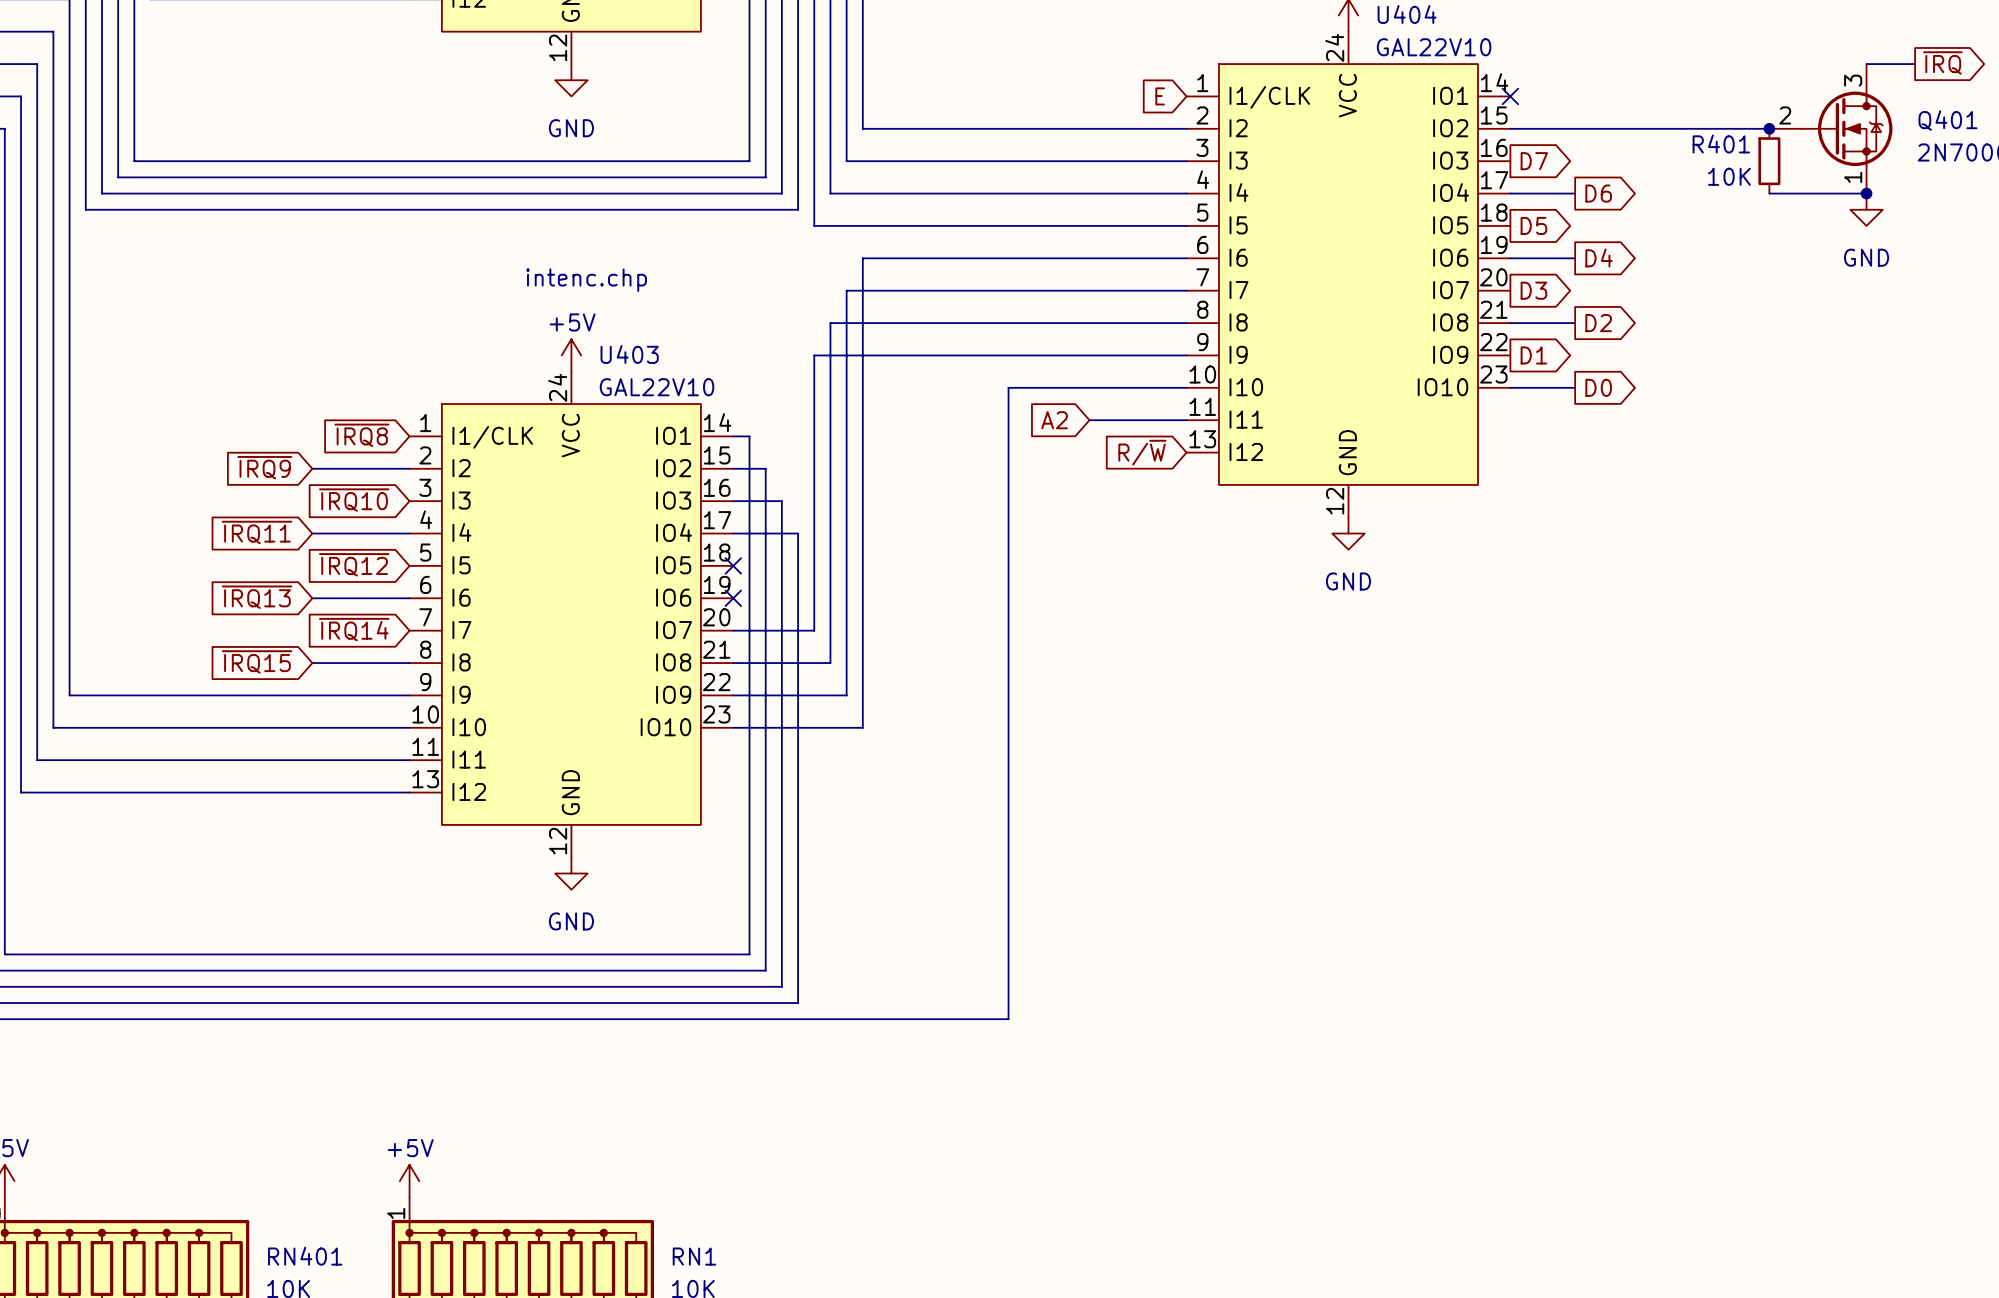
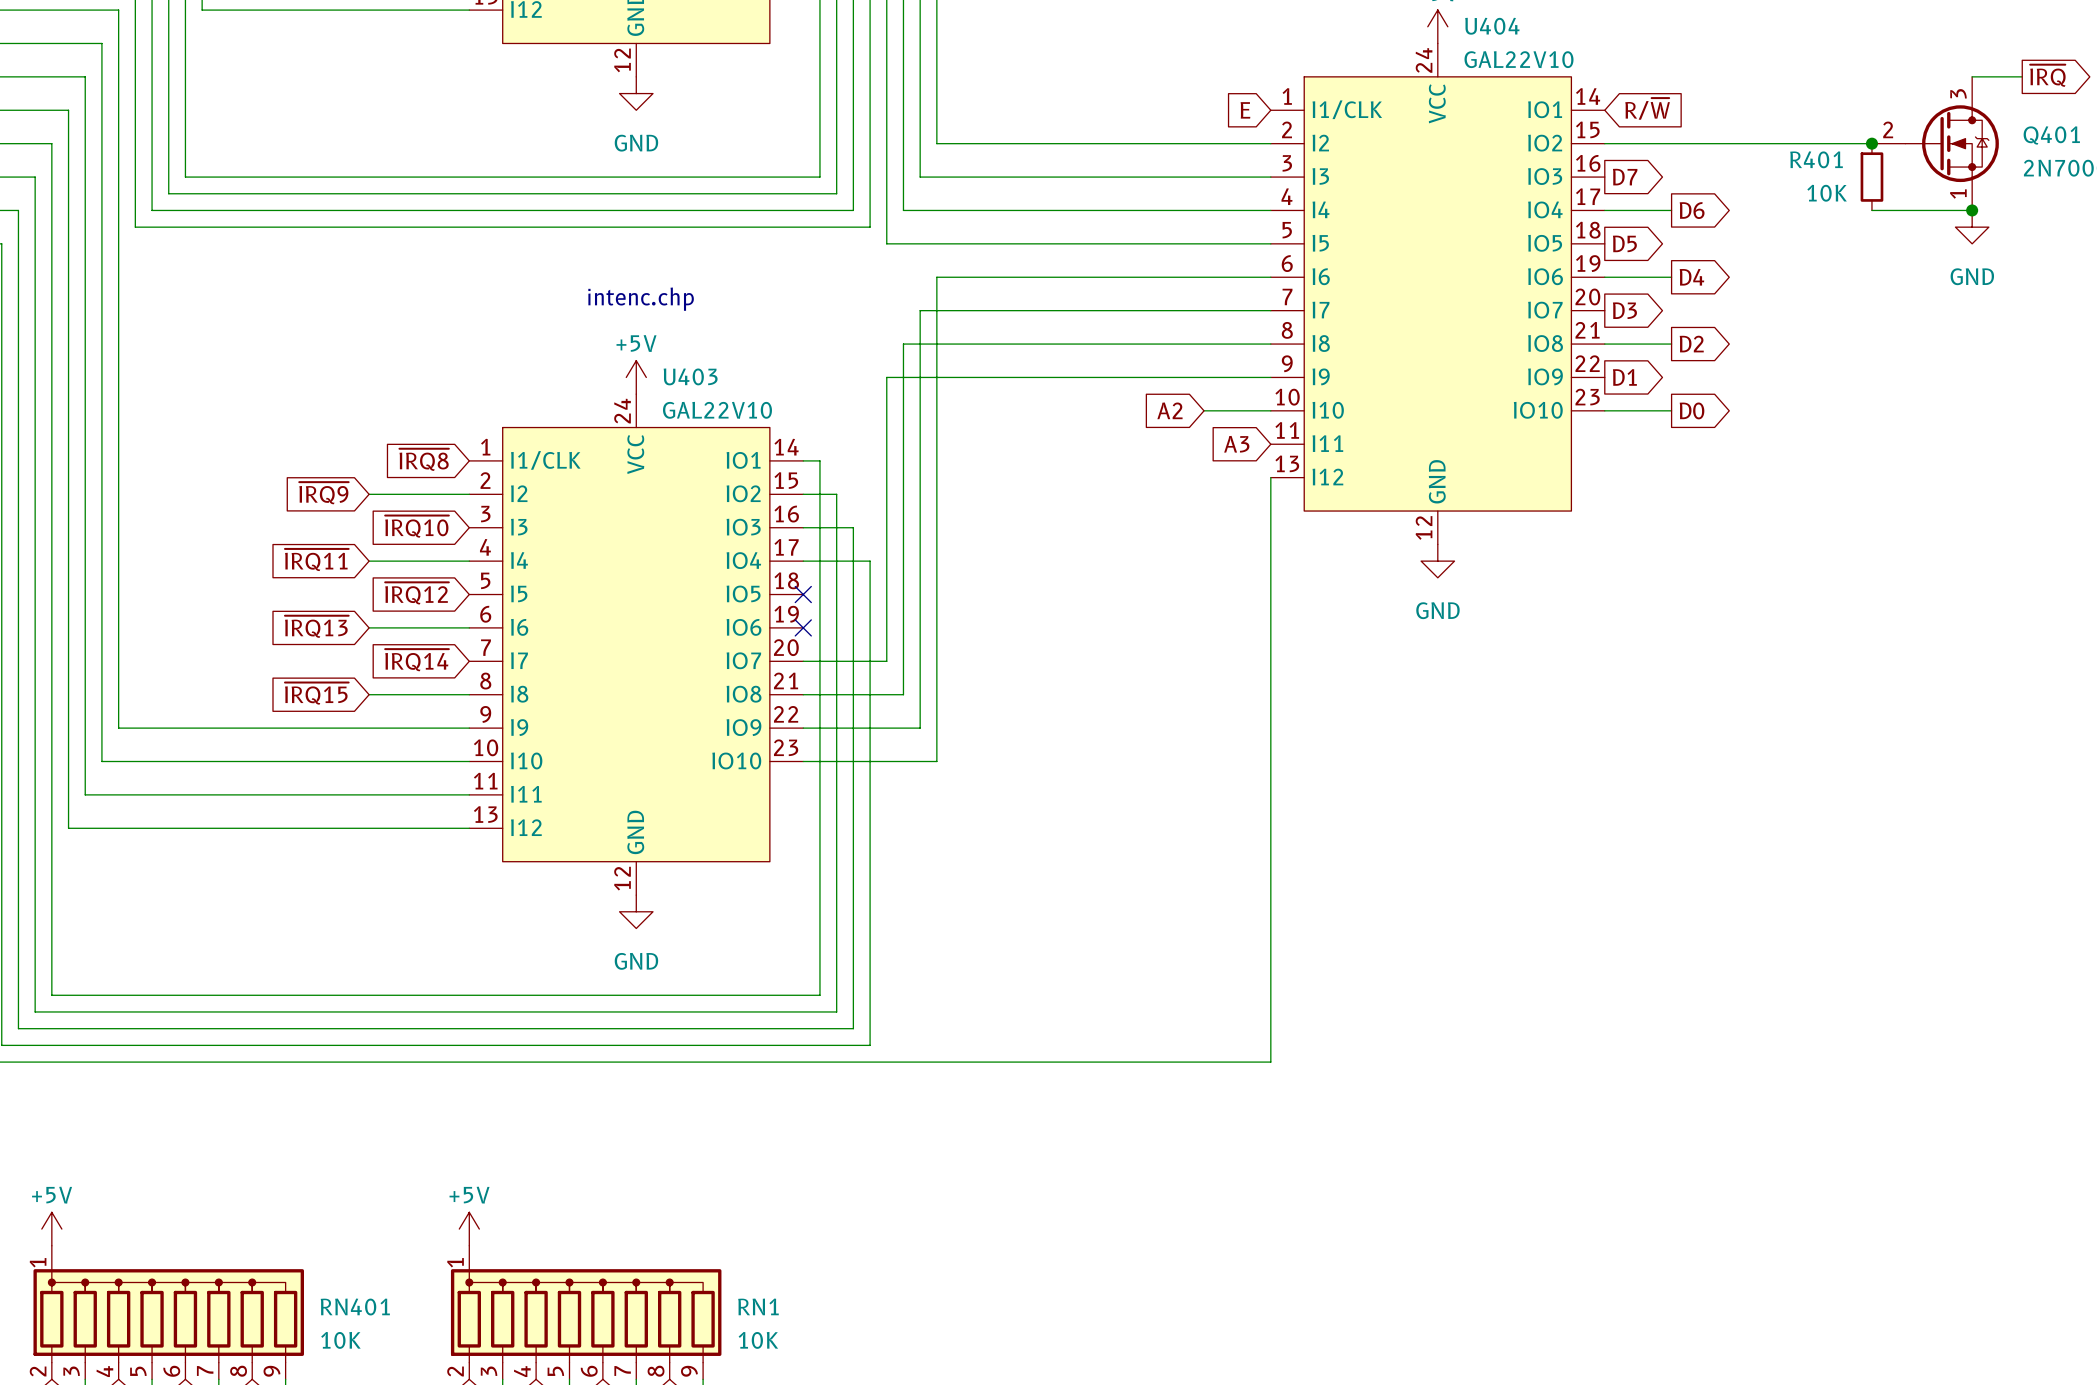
no-connect mark: (1510, 96) -> none
global label: none -> R/~{W} (1647, 108)
wire: (1121, 387) (1008, 387) (1008, 1019) -> (1270, 477) (1270, 1062) (1087, 1062)
global label position: A2 (1054, 420) -> A2 (1169, 410)
wire: (1089, 420) (1186, 420) -> none
global label: none -> A3 (1236, 444)
global label: R/~{W} (1142, 452) -> none

